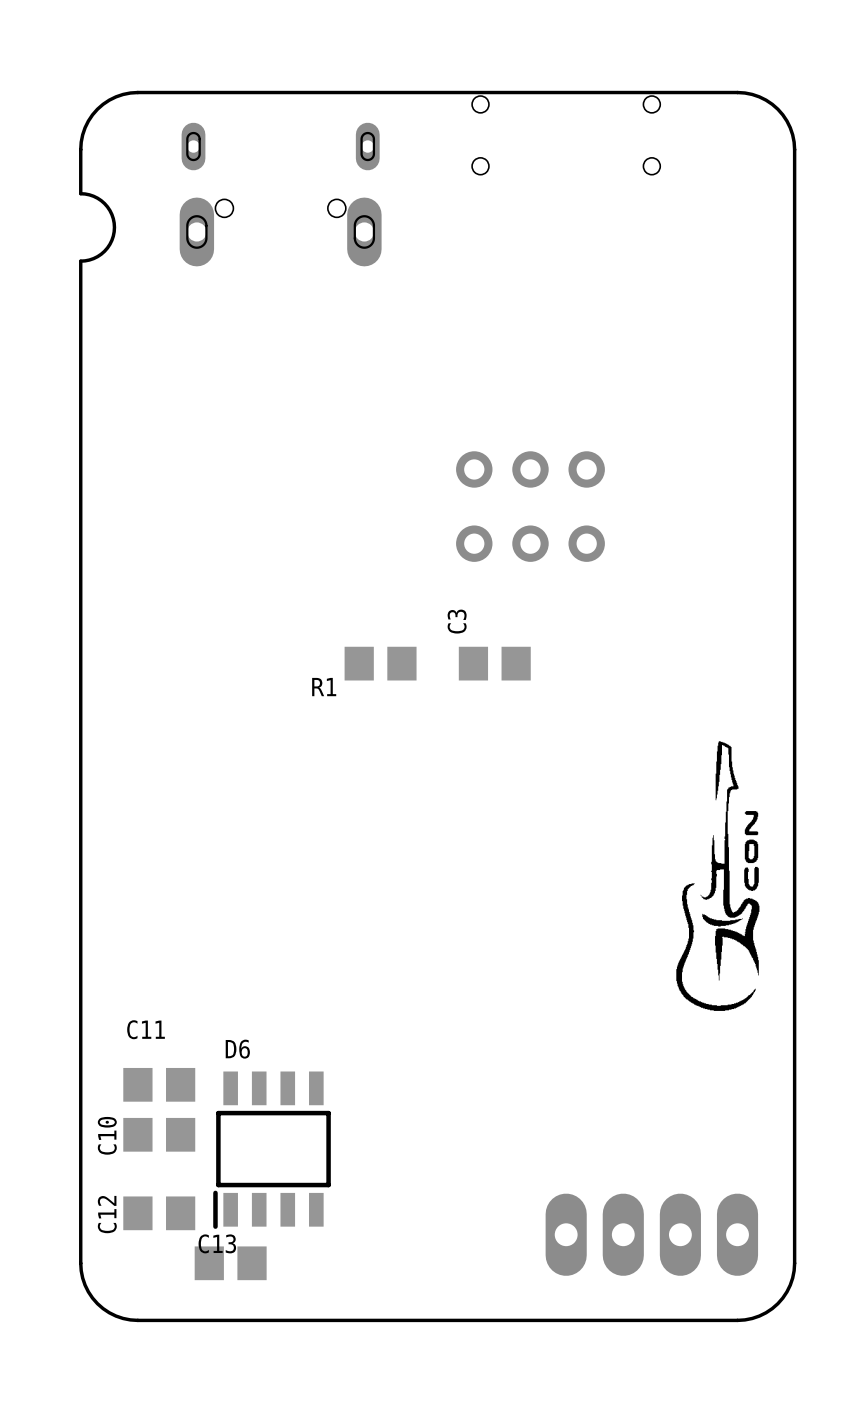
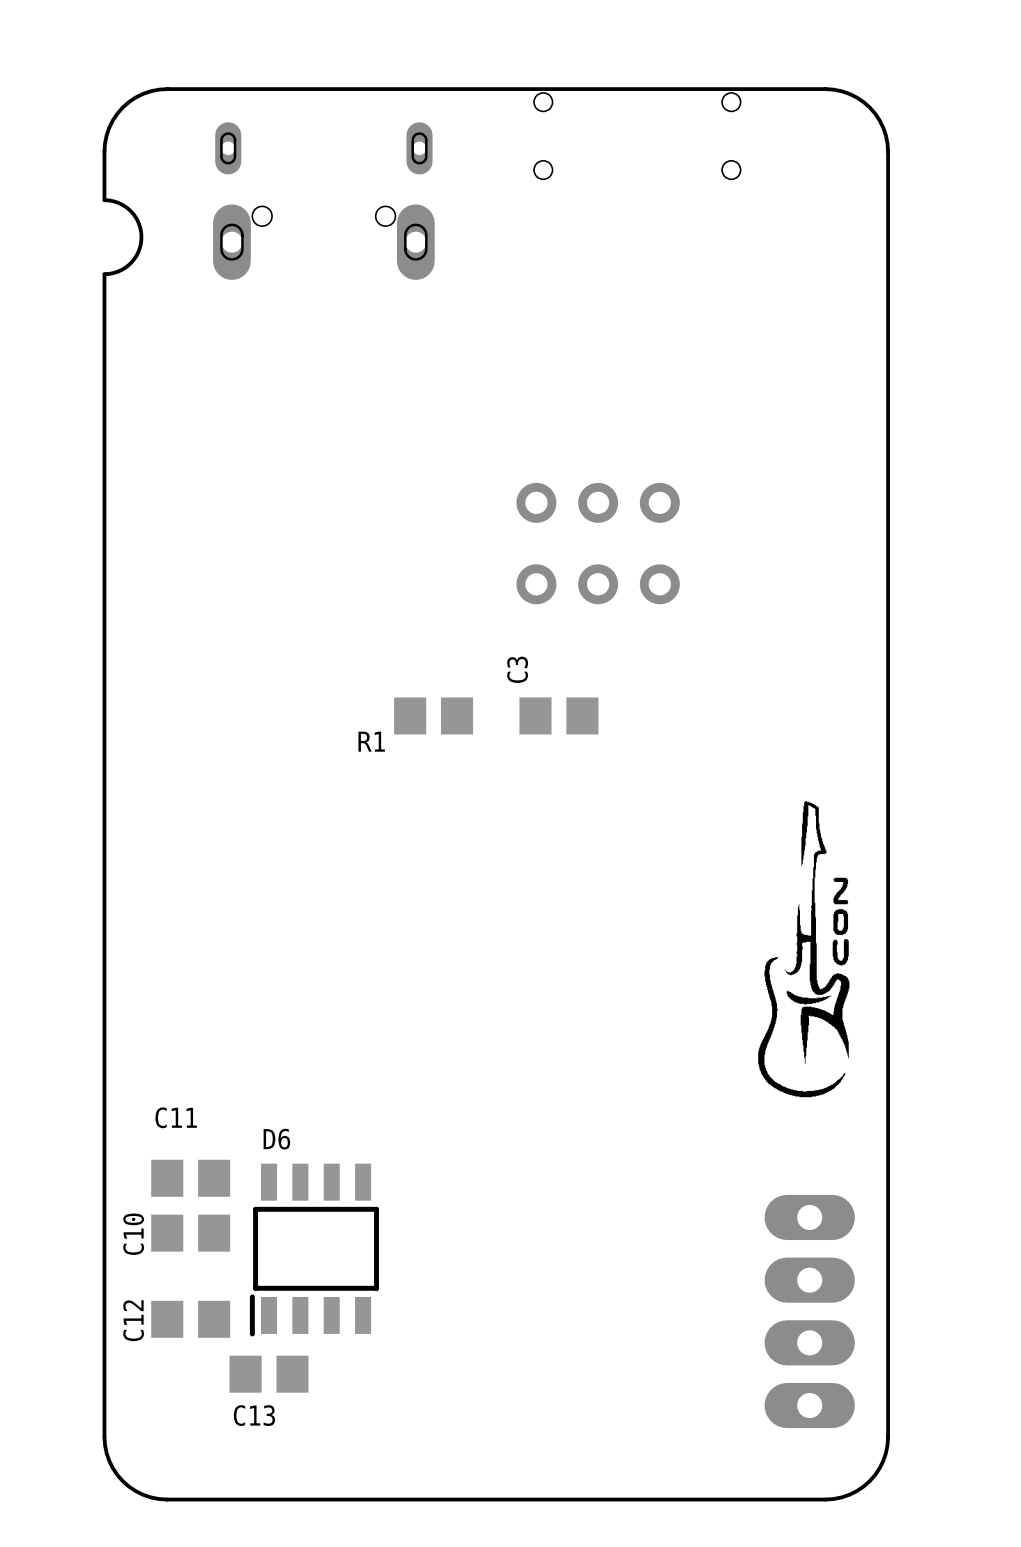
part rotation: 0° (651, 1234) -> 90° clockwise (809, 1311)
C13 name position: C13 (217, 1243) -> C13 (254, 1415)
board edge: (794, 1263) (790, 1285) (777, 1303) (759, 1316) (737, 1320) (130, 1319) (115, 1316) (97, 1303) (85, 1285) (80, 1263) -> (888, 1374) (887, 1445) (879, 1468) (869, 1481) (856, 1491) (841, 1497) (825, 1499) (158, 1499) (143, 1494) (129, 1486) (117, 1475) (109, 1460) (104, 1436) (104, 1374)

